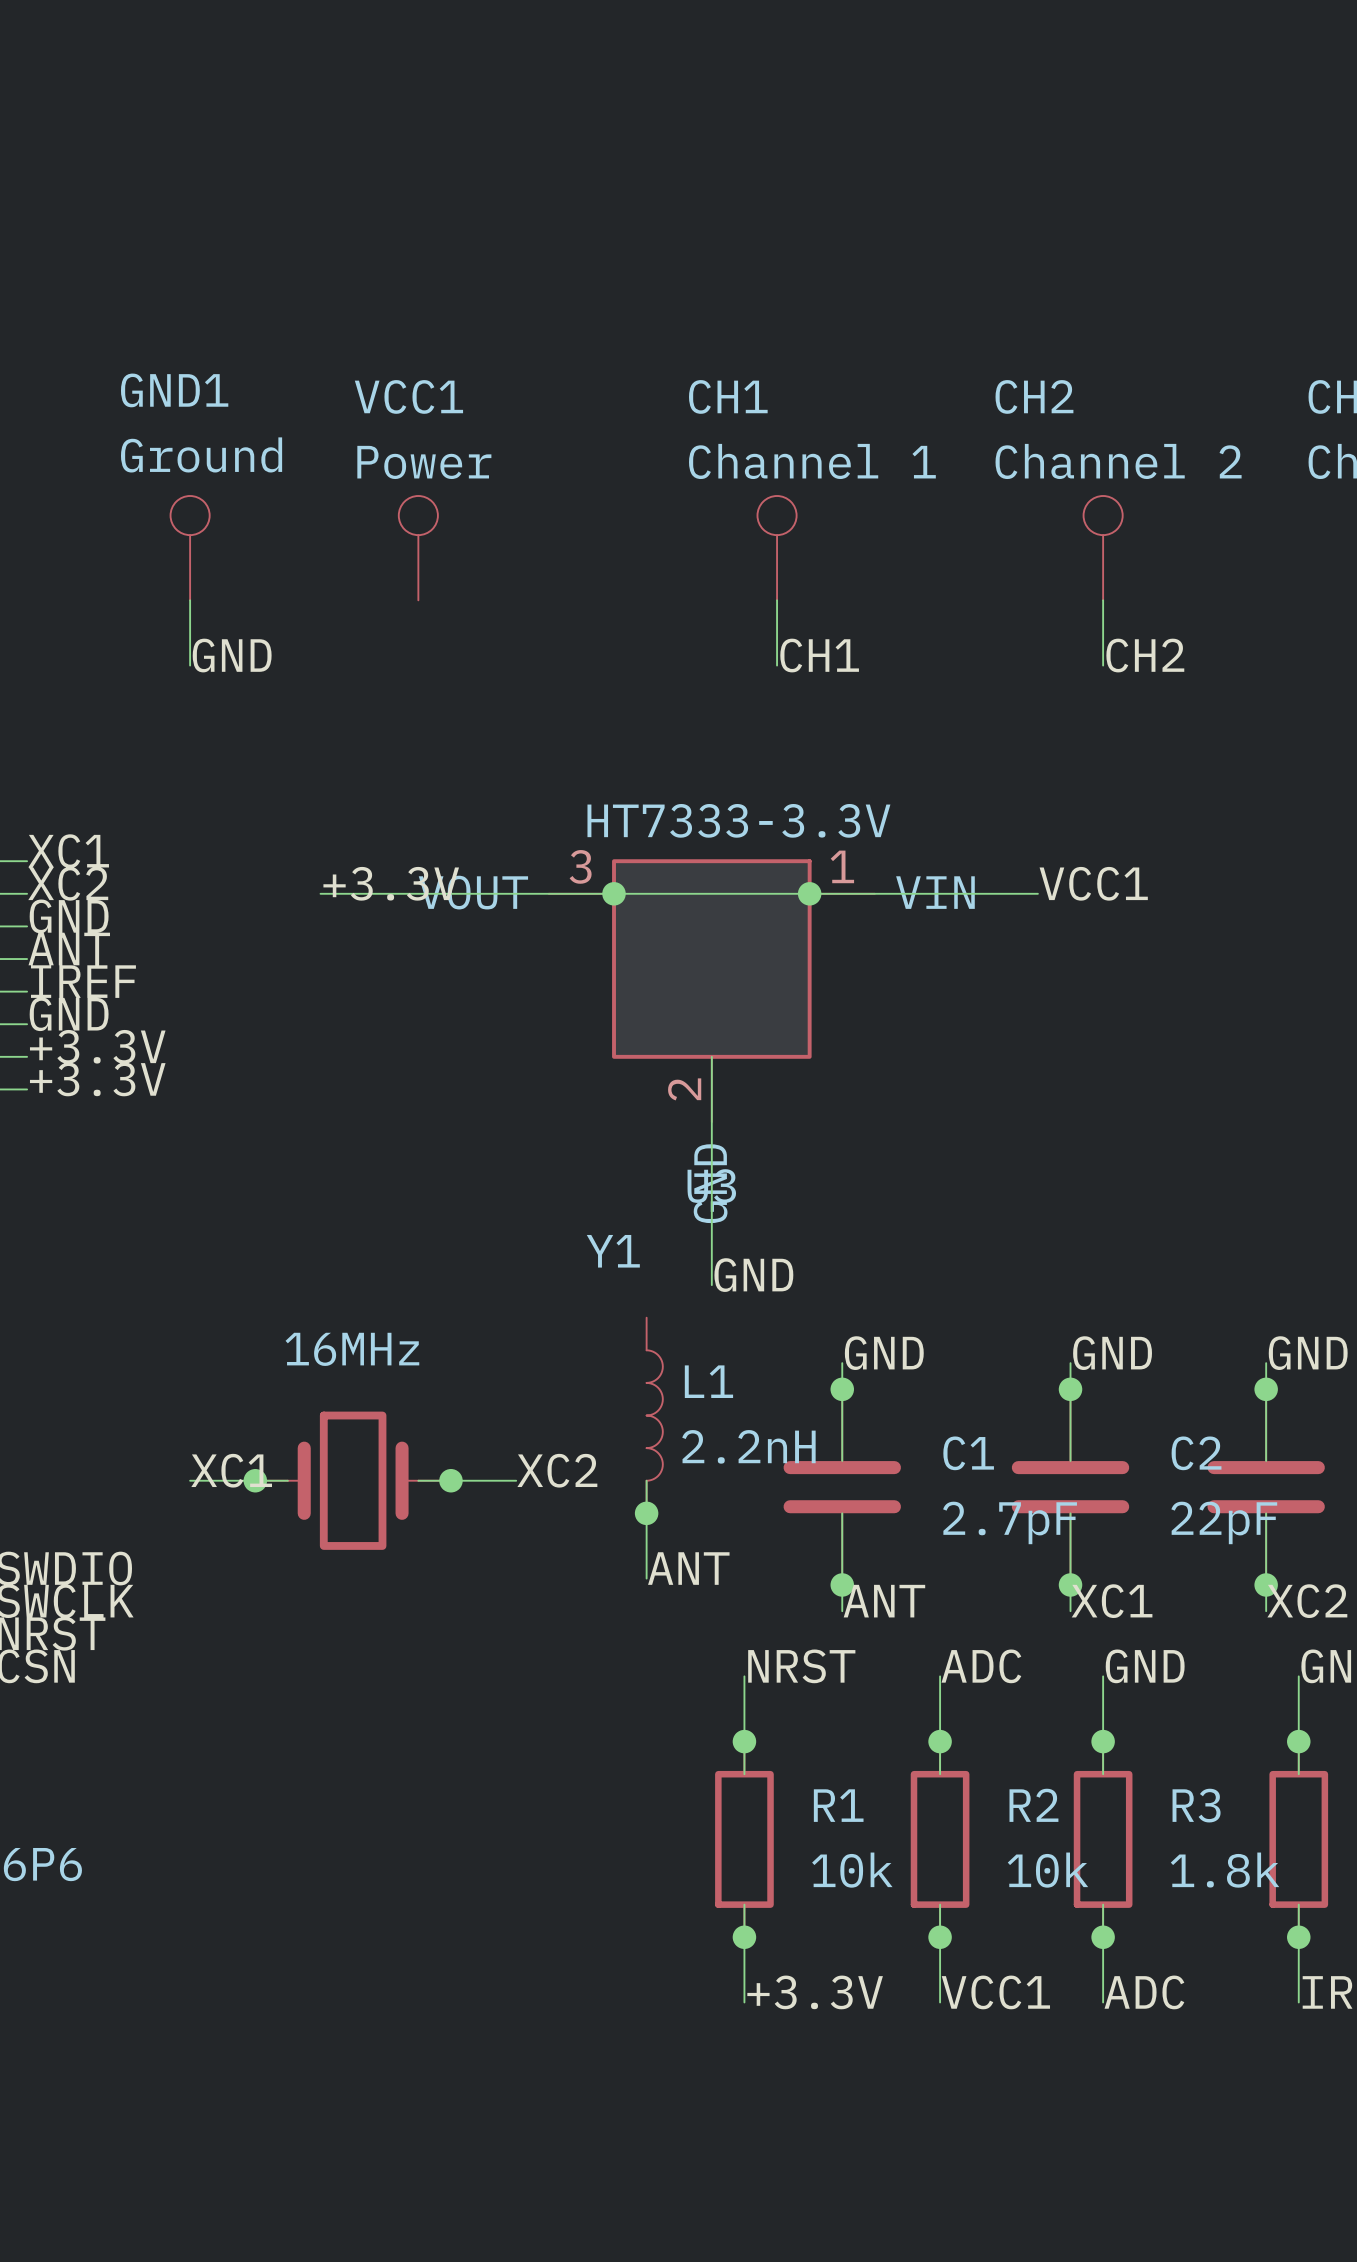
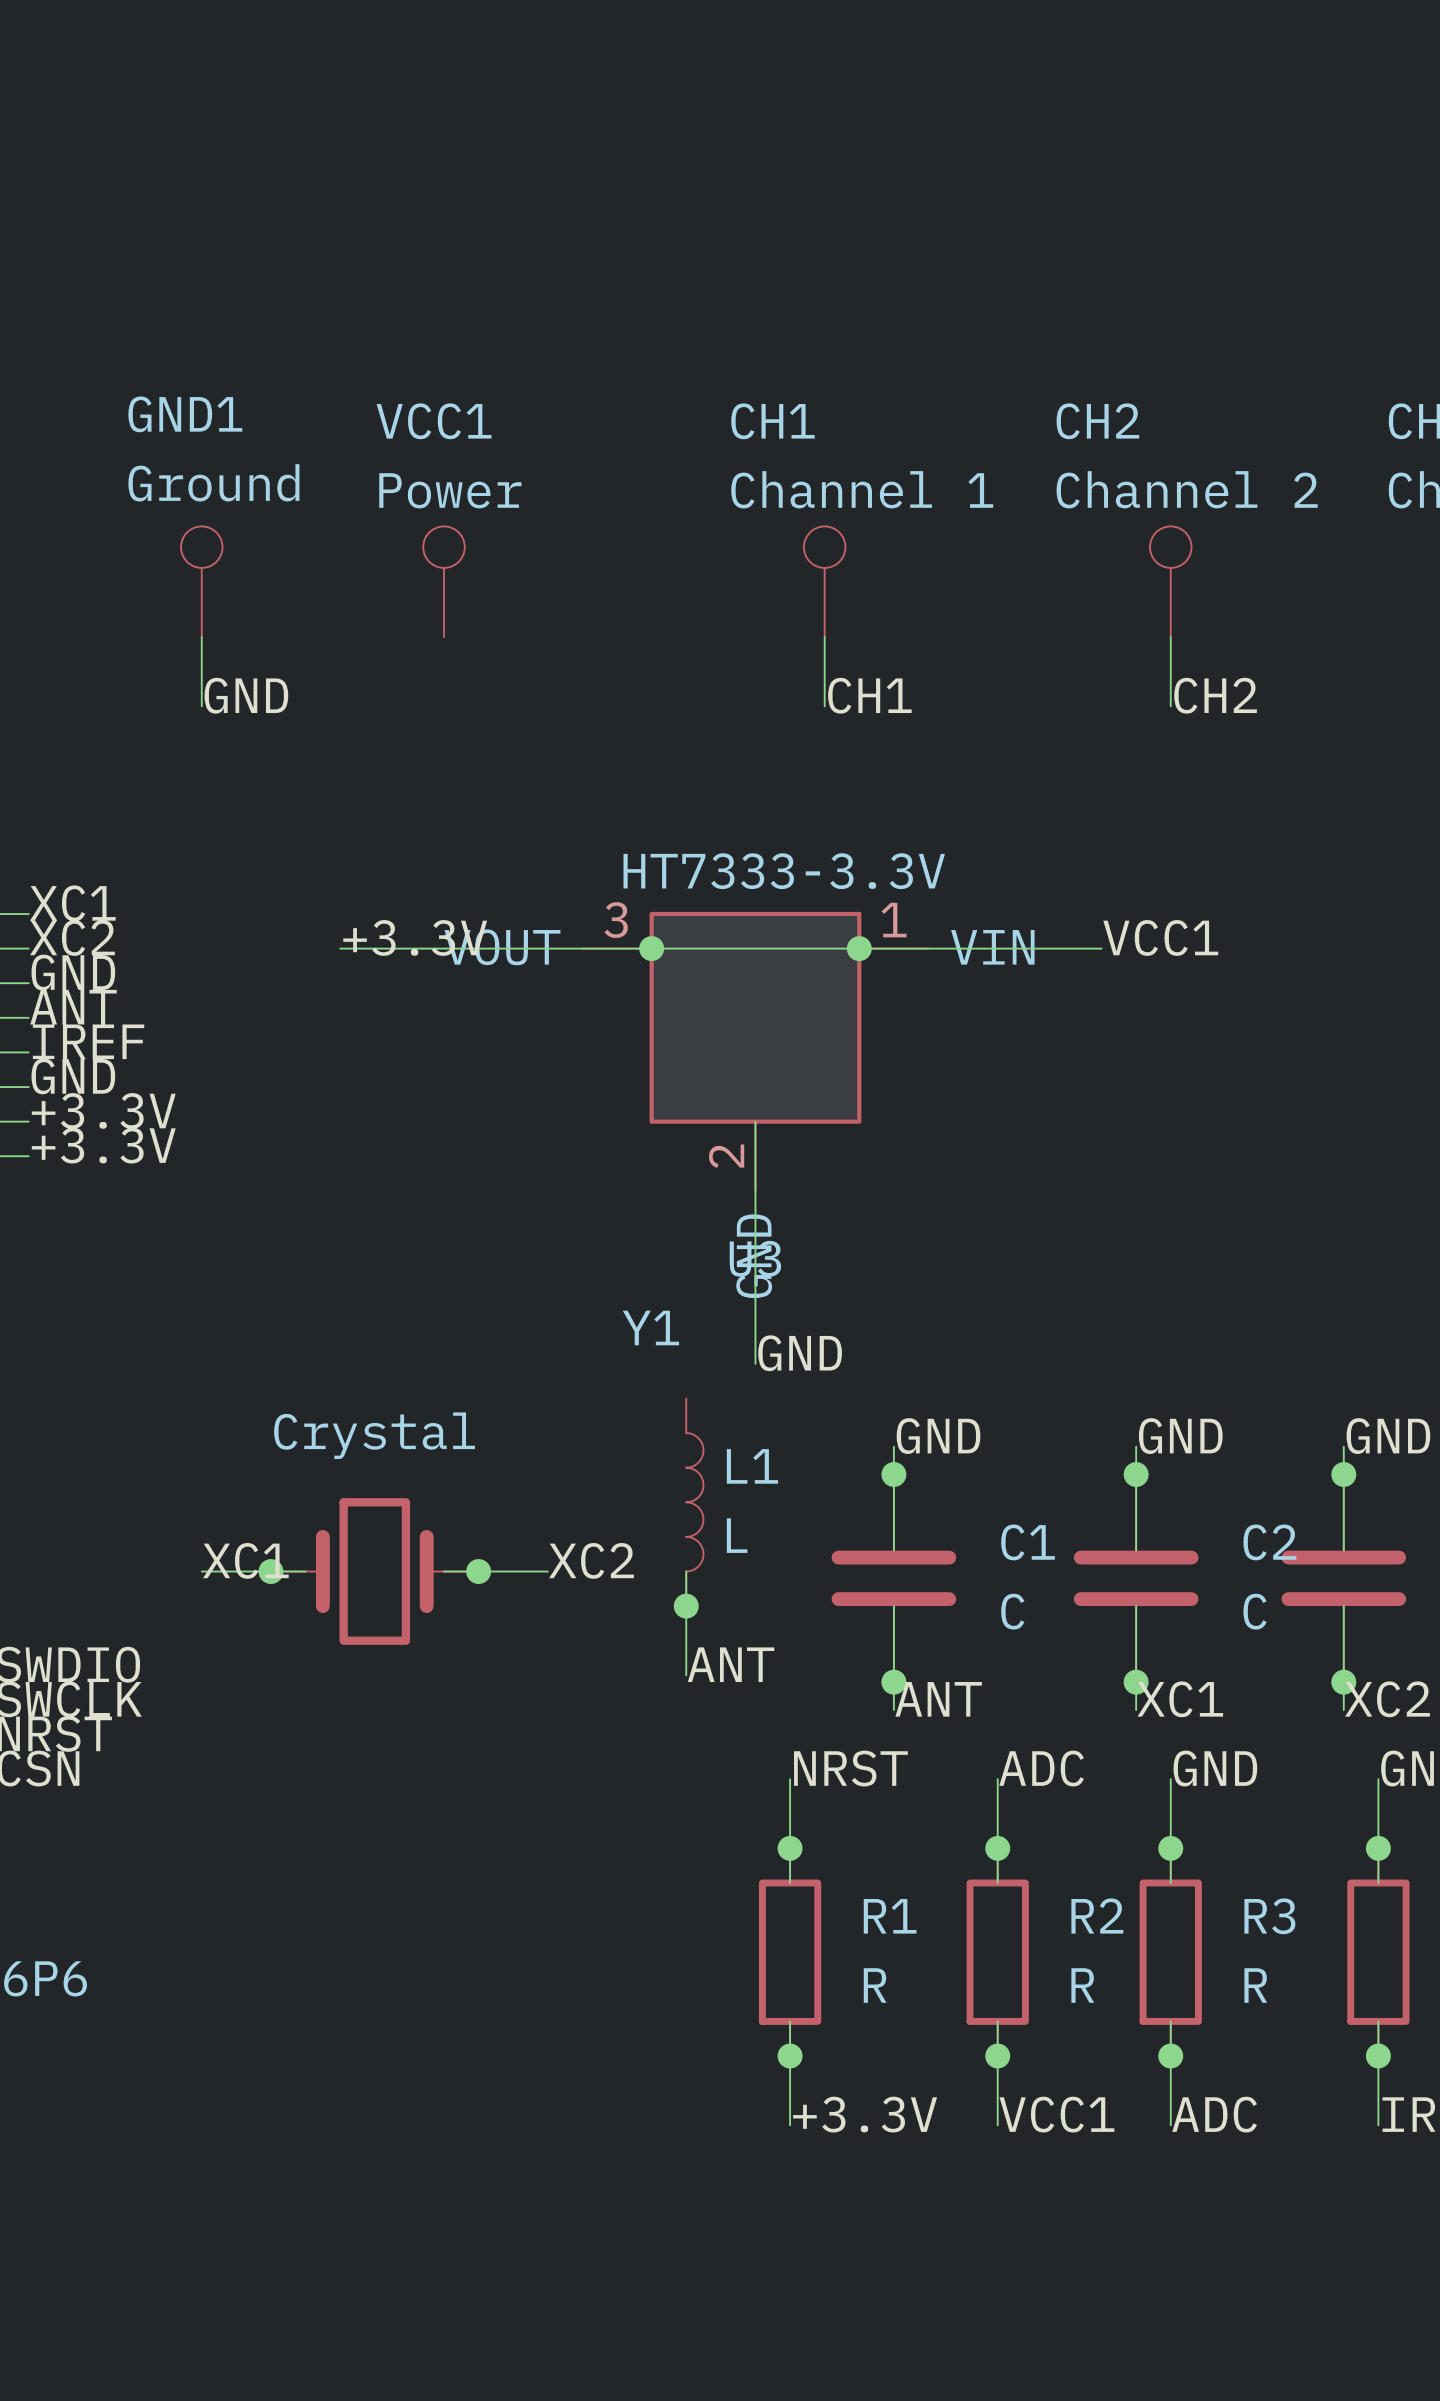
Y1 value: 16MHz (352, 1349) -> Crystal (374, 1435)
L1 value: 2.2nH (748, 1446) -> L (737, 1535)
C1 value: 2.7pF (1010, 1522) -> C (1012, 1611)
C2 value: 22pF (1224, 1522) -> C (1255, 1611)
R1 value: 10k (852, 1870) -> R (875, 1985)
R2 value: 10k (1047, 1870) -> R (1082, 1985)
R3 value: 1.8k (1225, 1870) -> R (1255, 1985)

